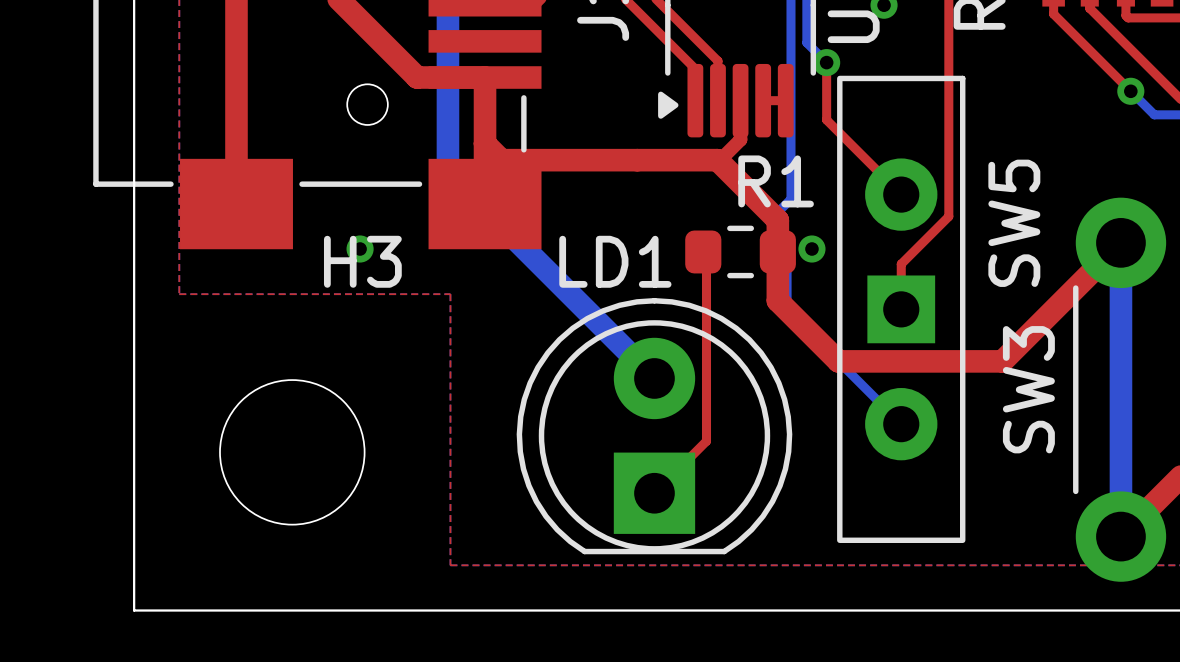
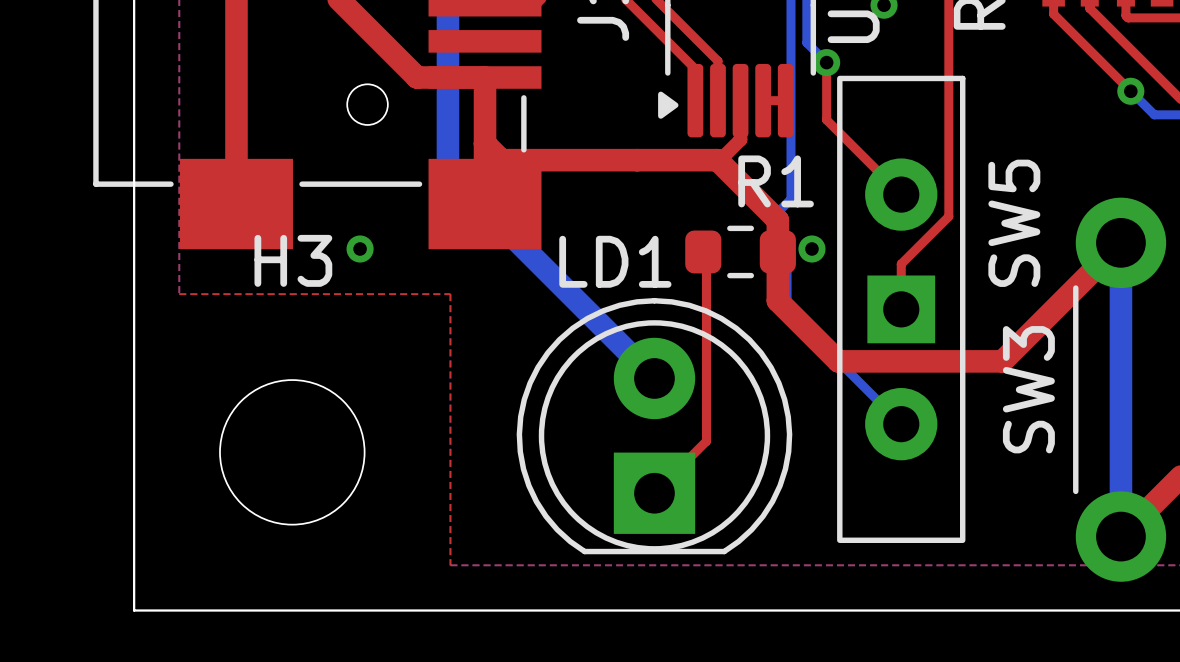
H3 name position: H3 (362, 261) -> H3 (293, 260)

